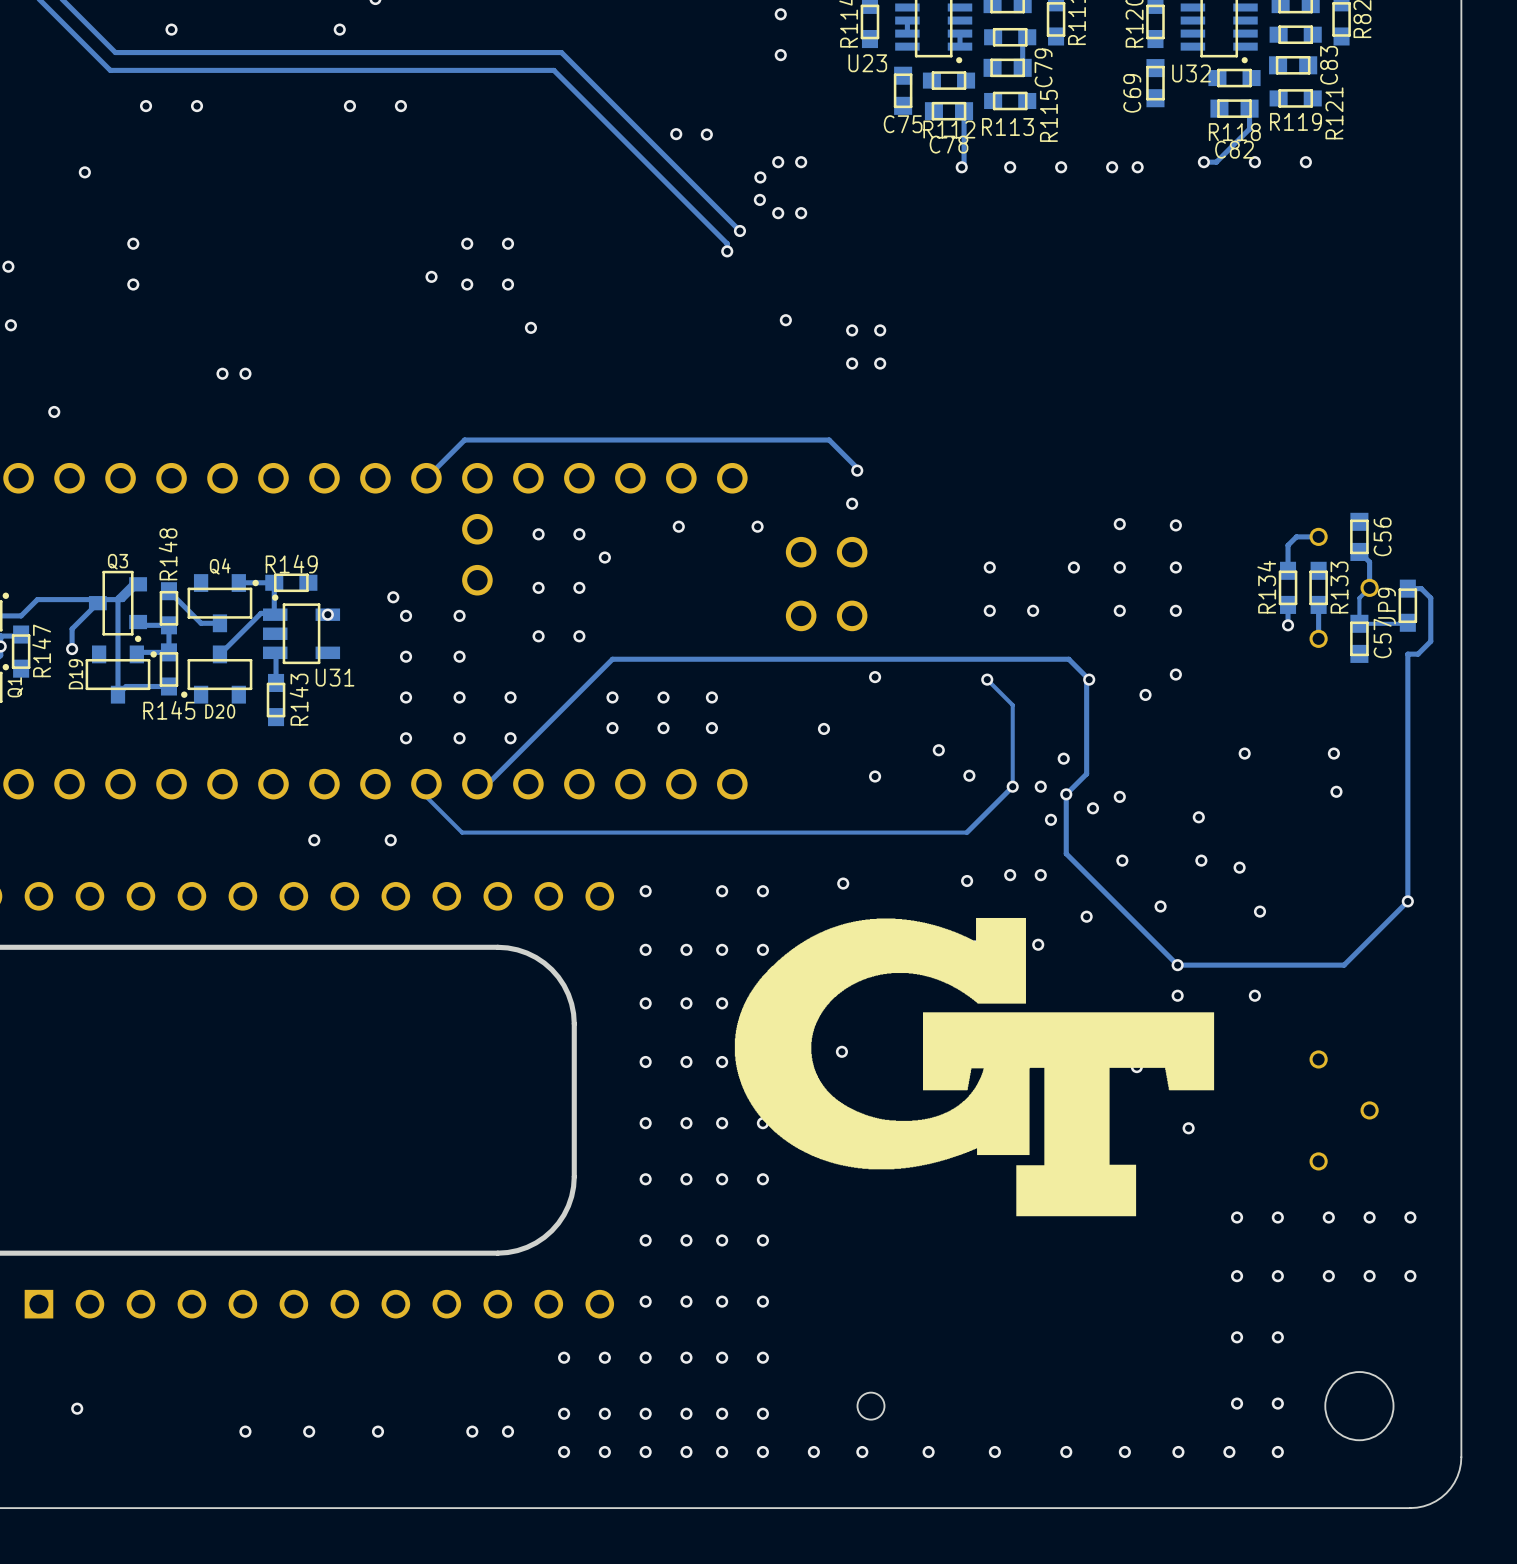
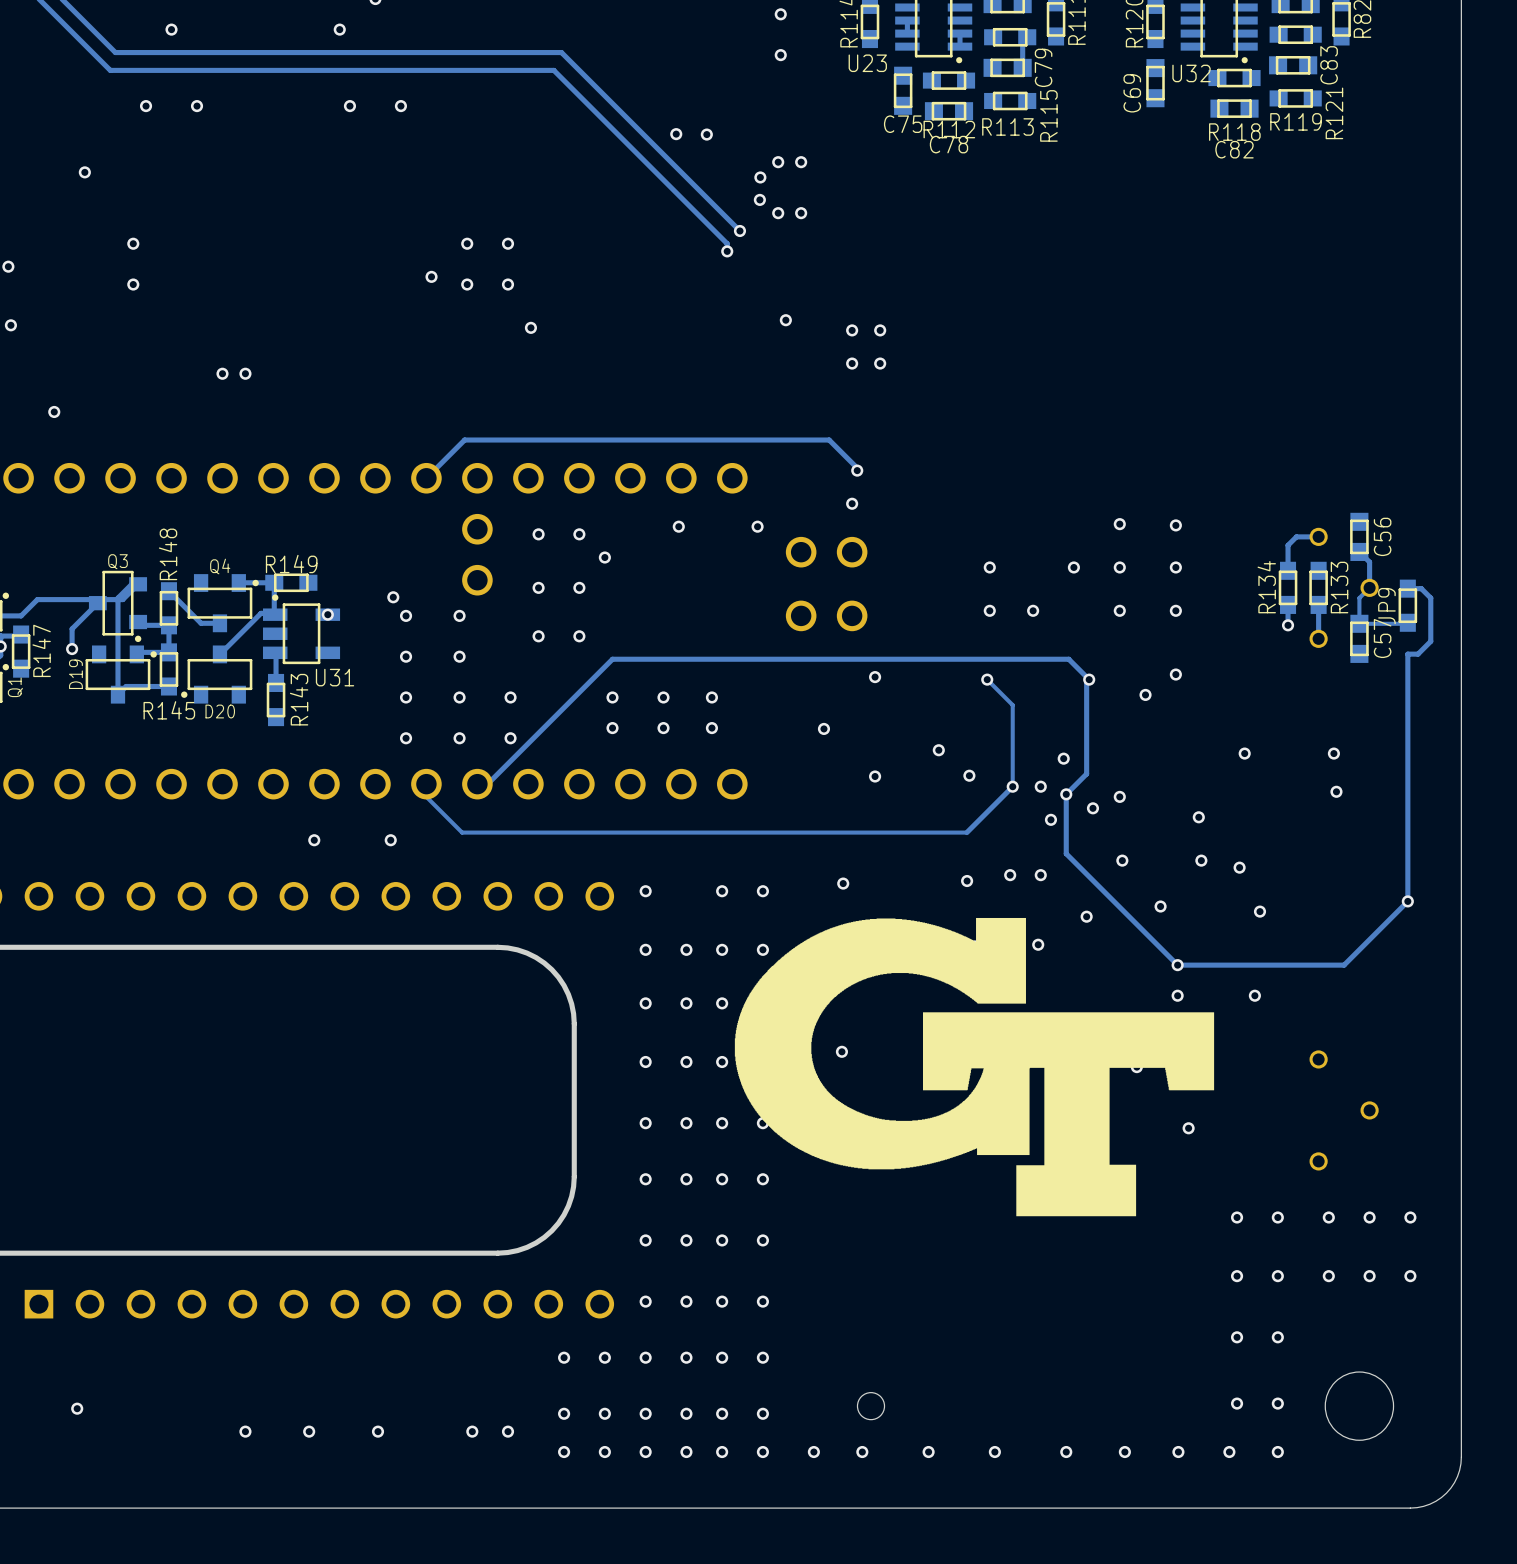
track: (1249, 108) (1249, 129) (1216, 162) (1203, 162) -> none
track: (964, 111) (964, 164) (961, 167) -> none
via: (1203, 162) -> none
via: (1254, 162) -> none
via: (1305, 162) -> none
via: (961, 167) -> none
via: (1010, 167) -> none
via: (1061, 167) -> none
via: (1112, 167) -> none
via: (1137, 167) -> none

